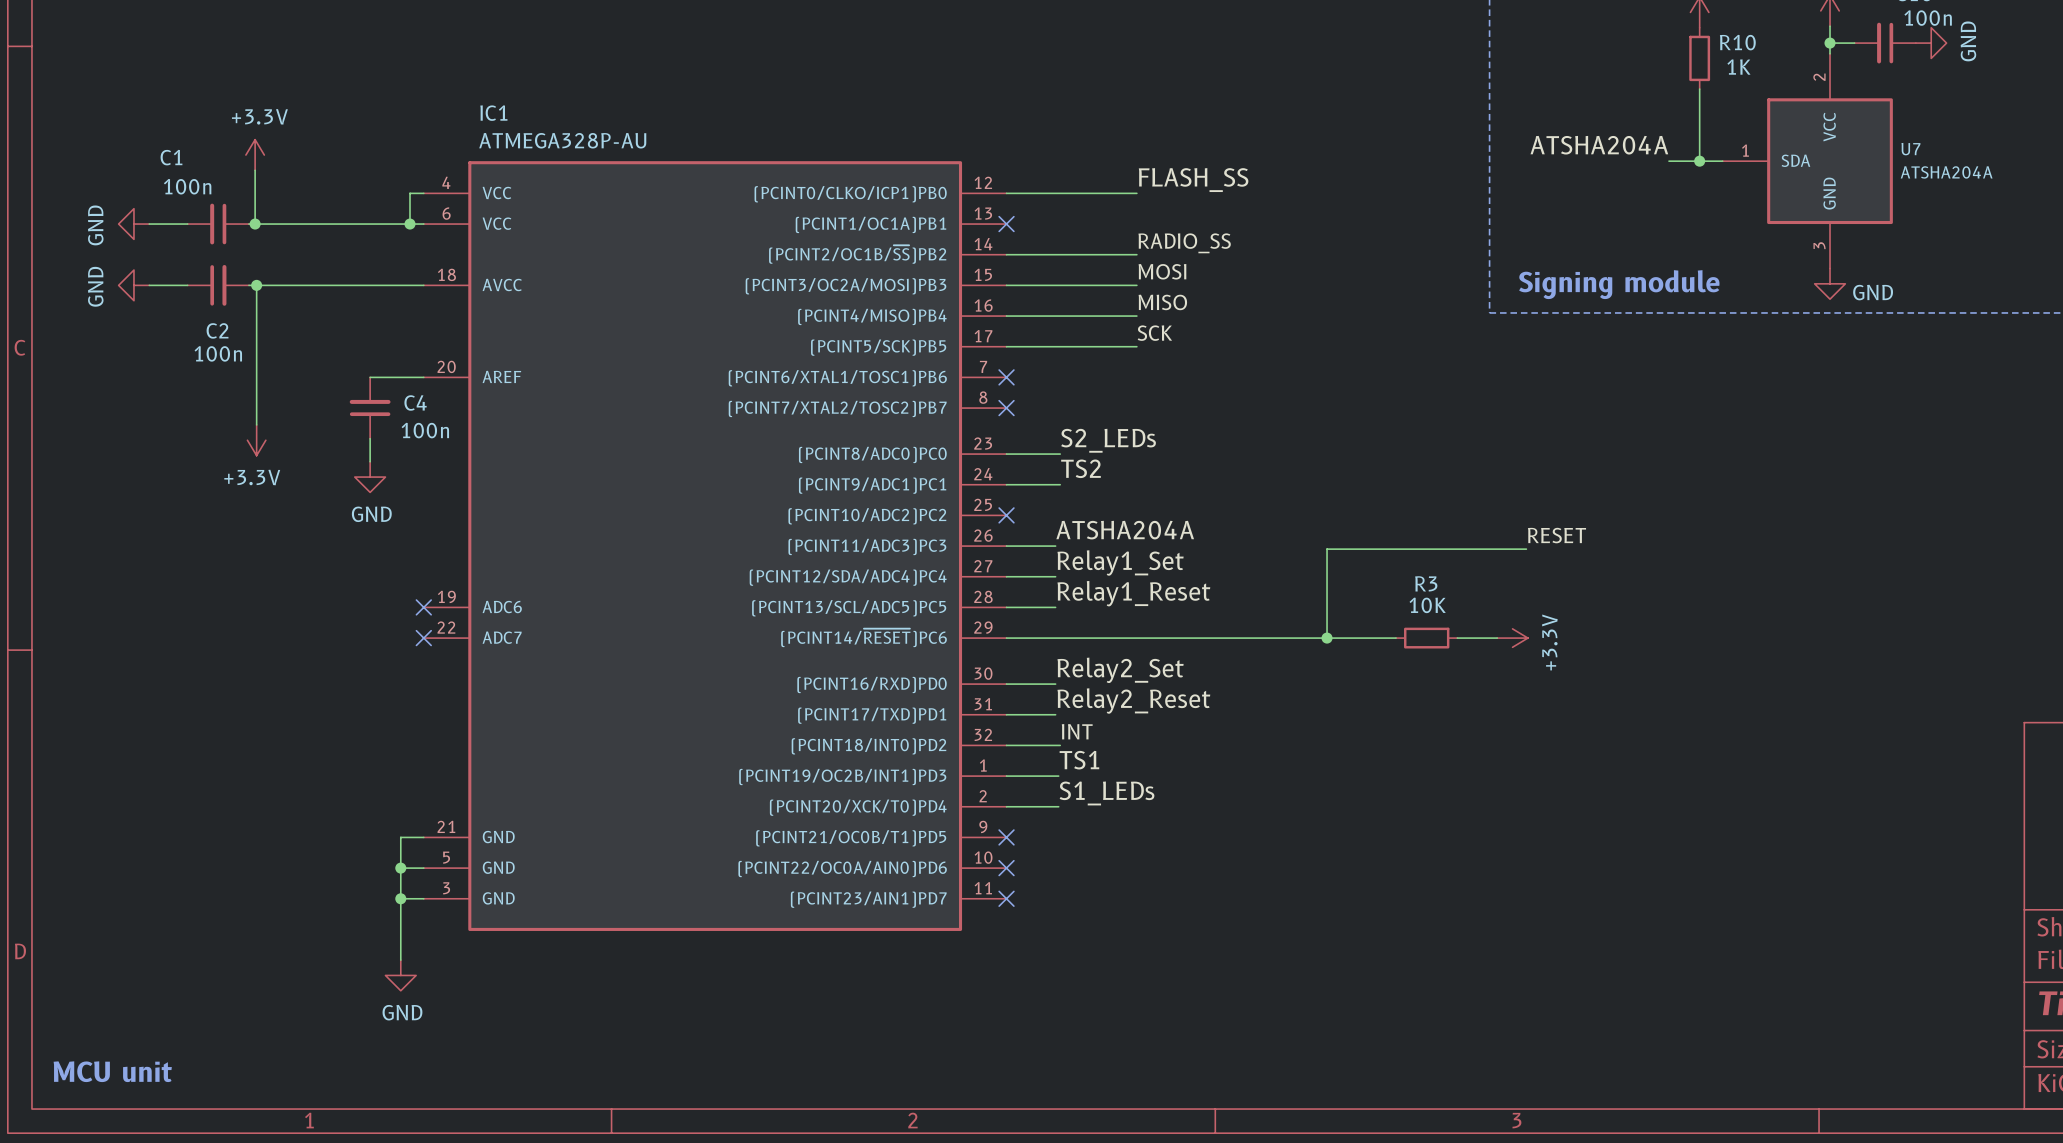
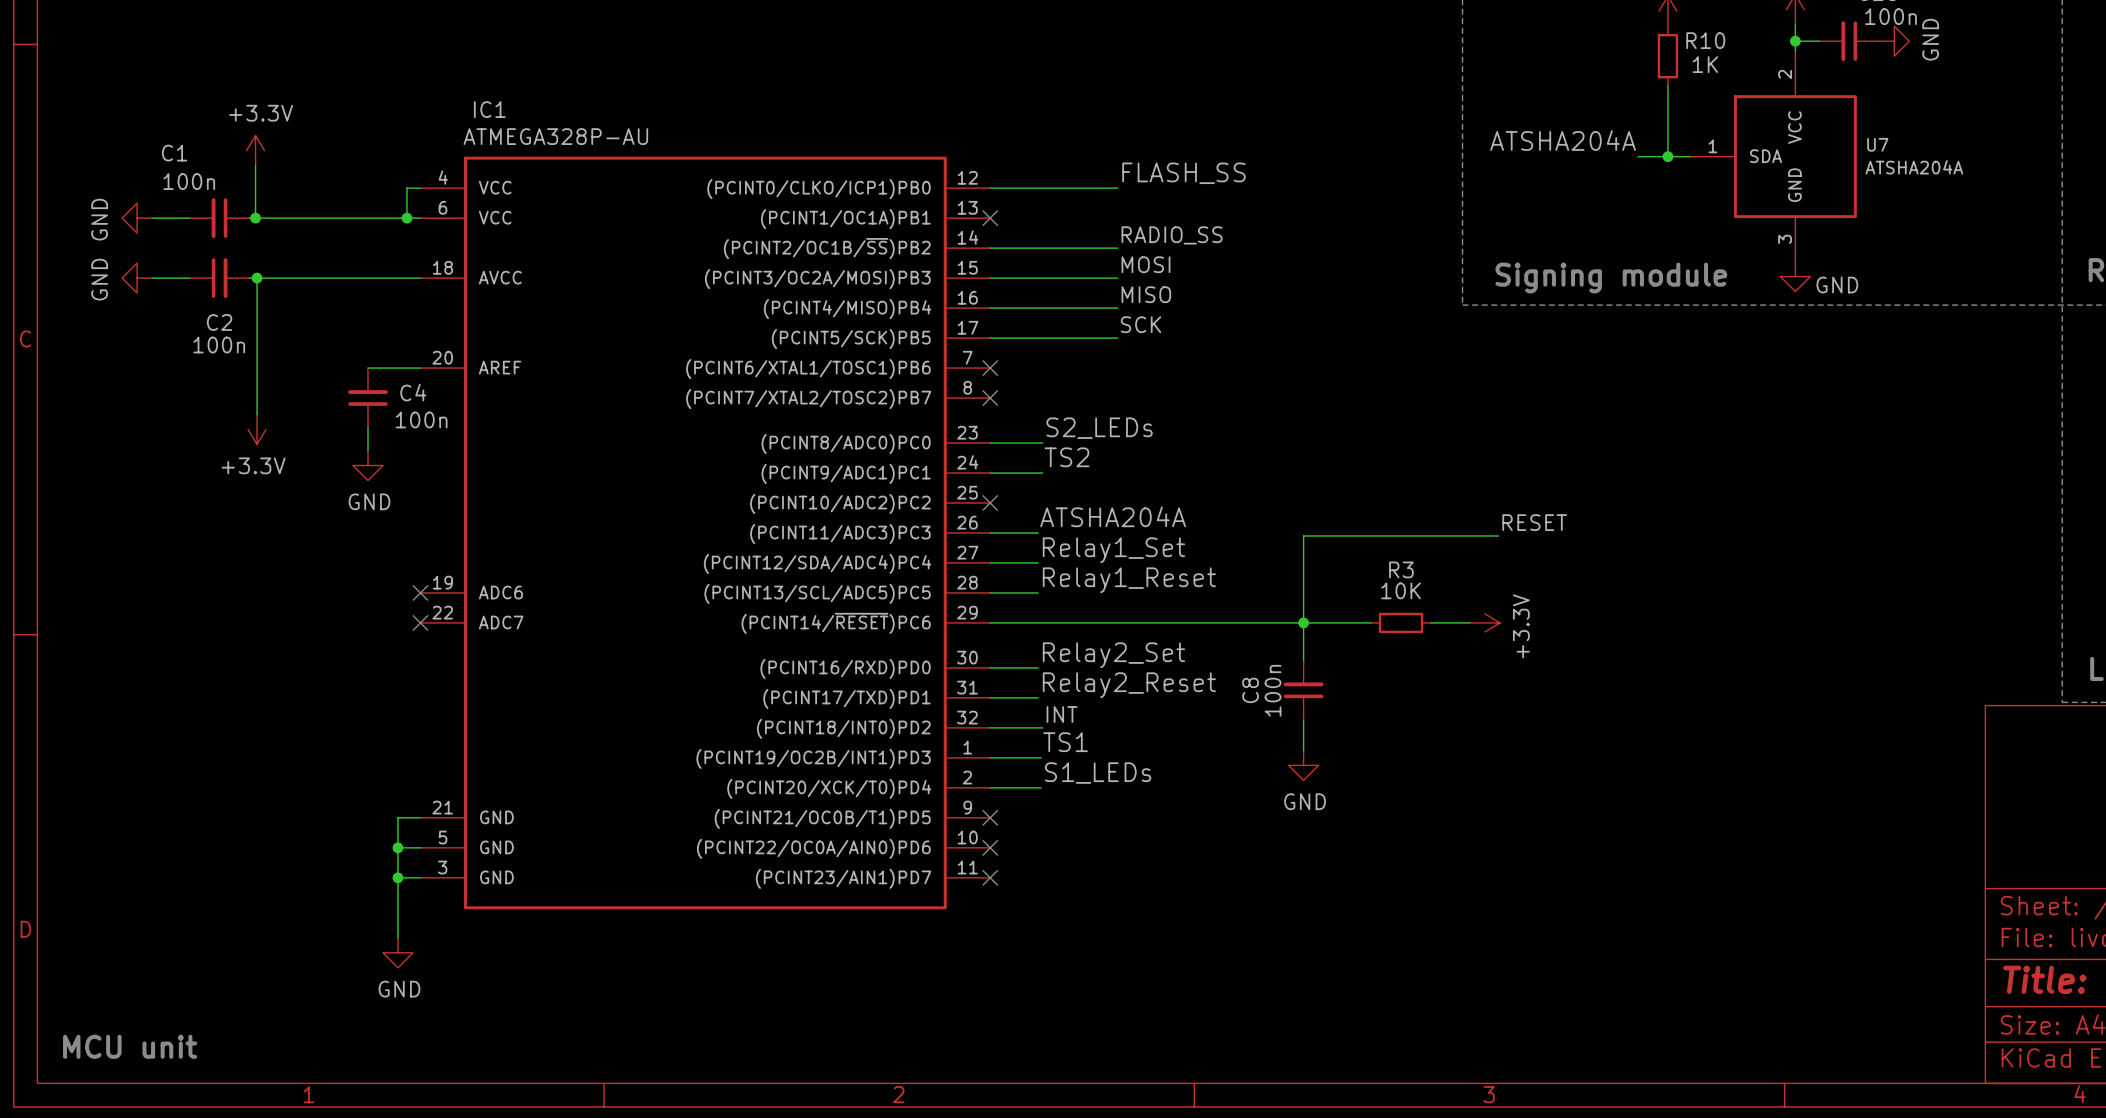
wire: none -> (1303, 622) (1303, 660)
C8: none -> 100n (1303, 690)
wire: none -> (1303, 720) (1303, 750)
power symbol: none -> GND (1303, 765)

